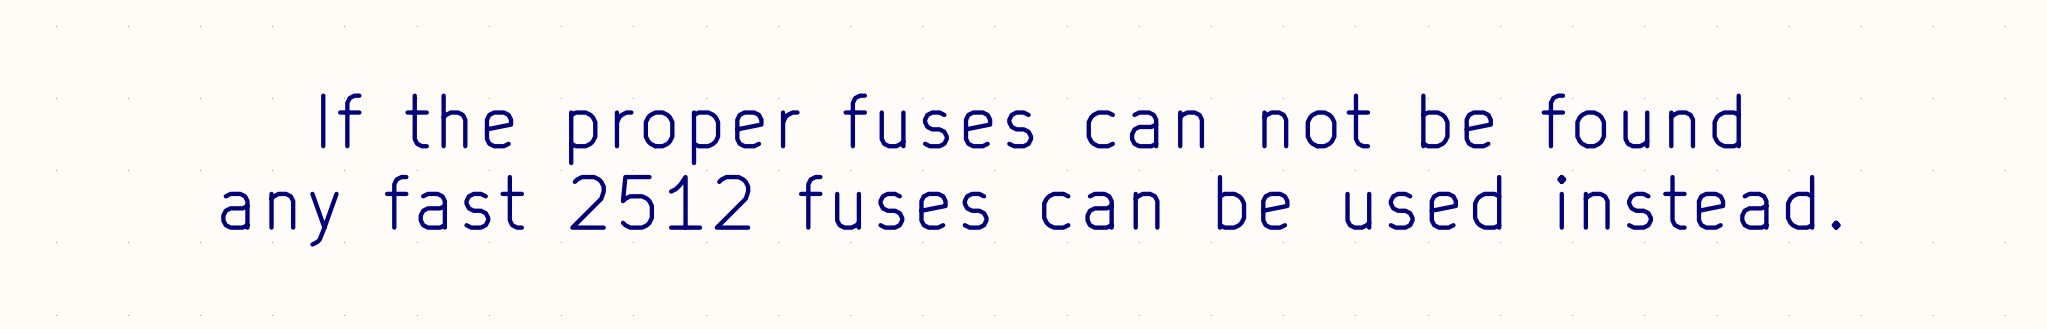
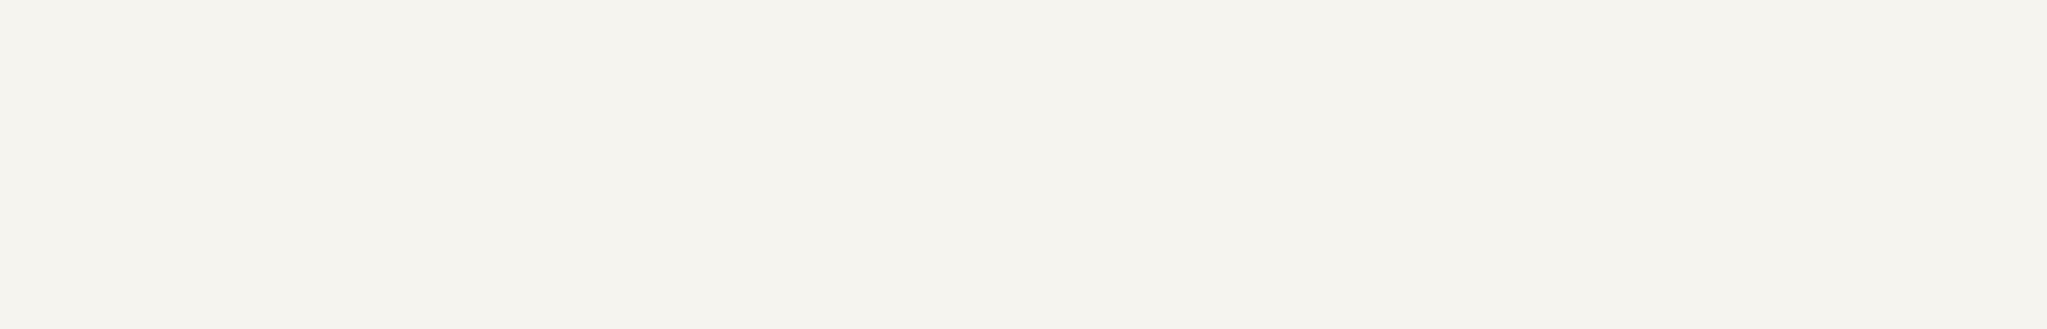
text: If the proper fuses can not be found (1030, 129) -> none
text: any fast 2512 fuses can be used instead. (1030, 210) -> none

